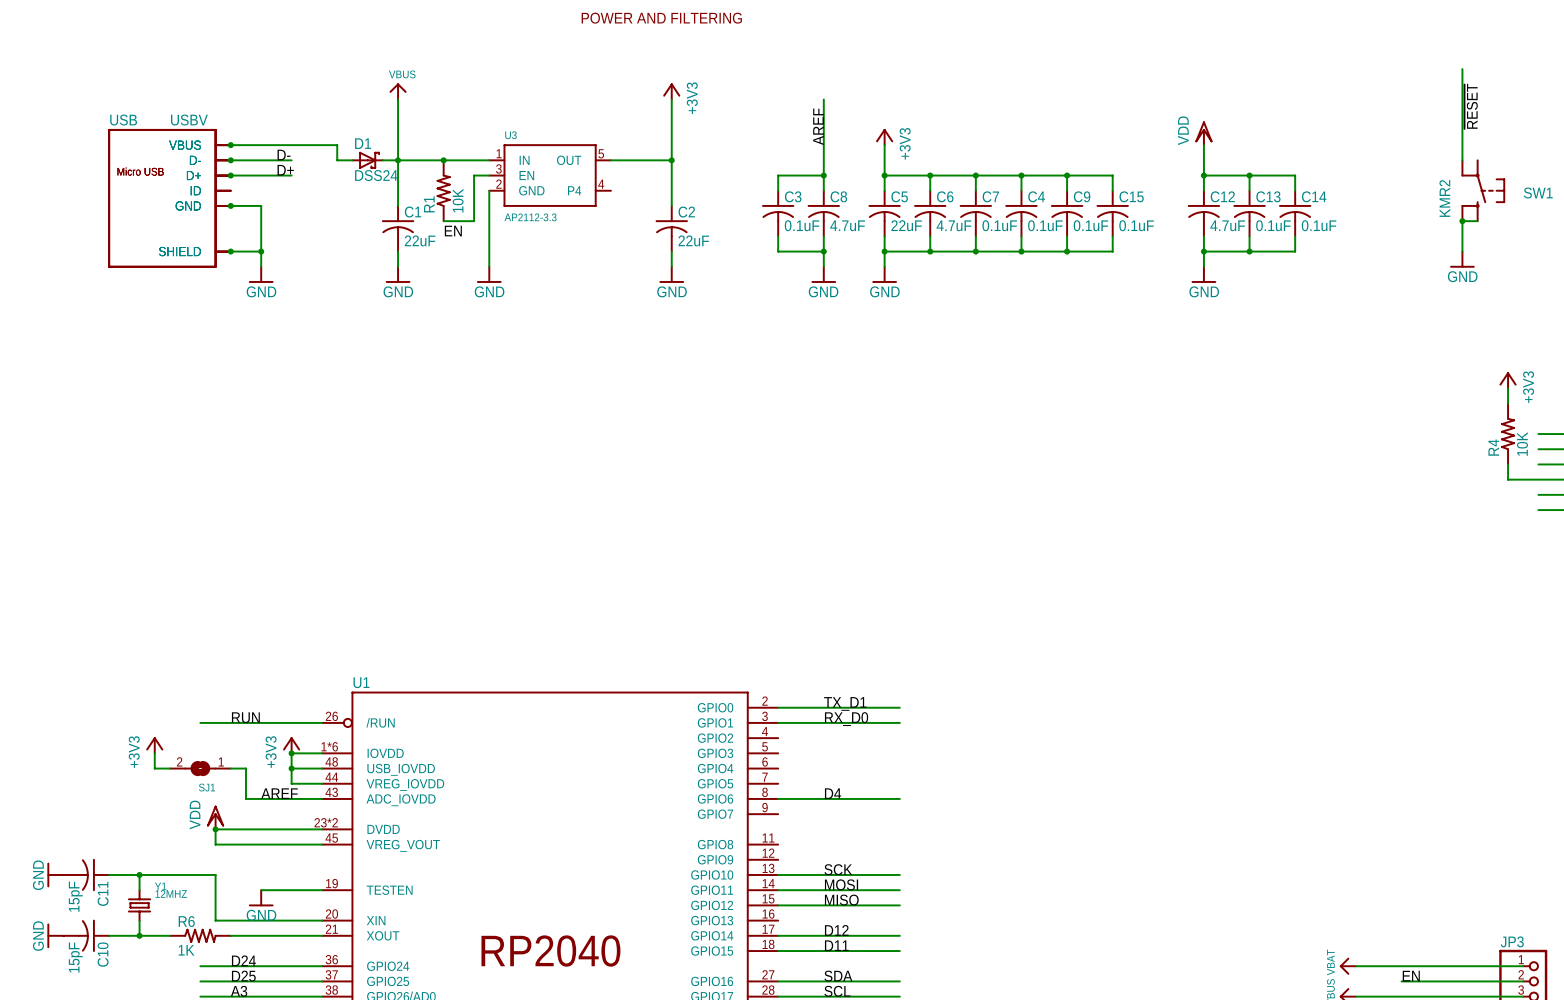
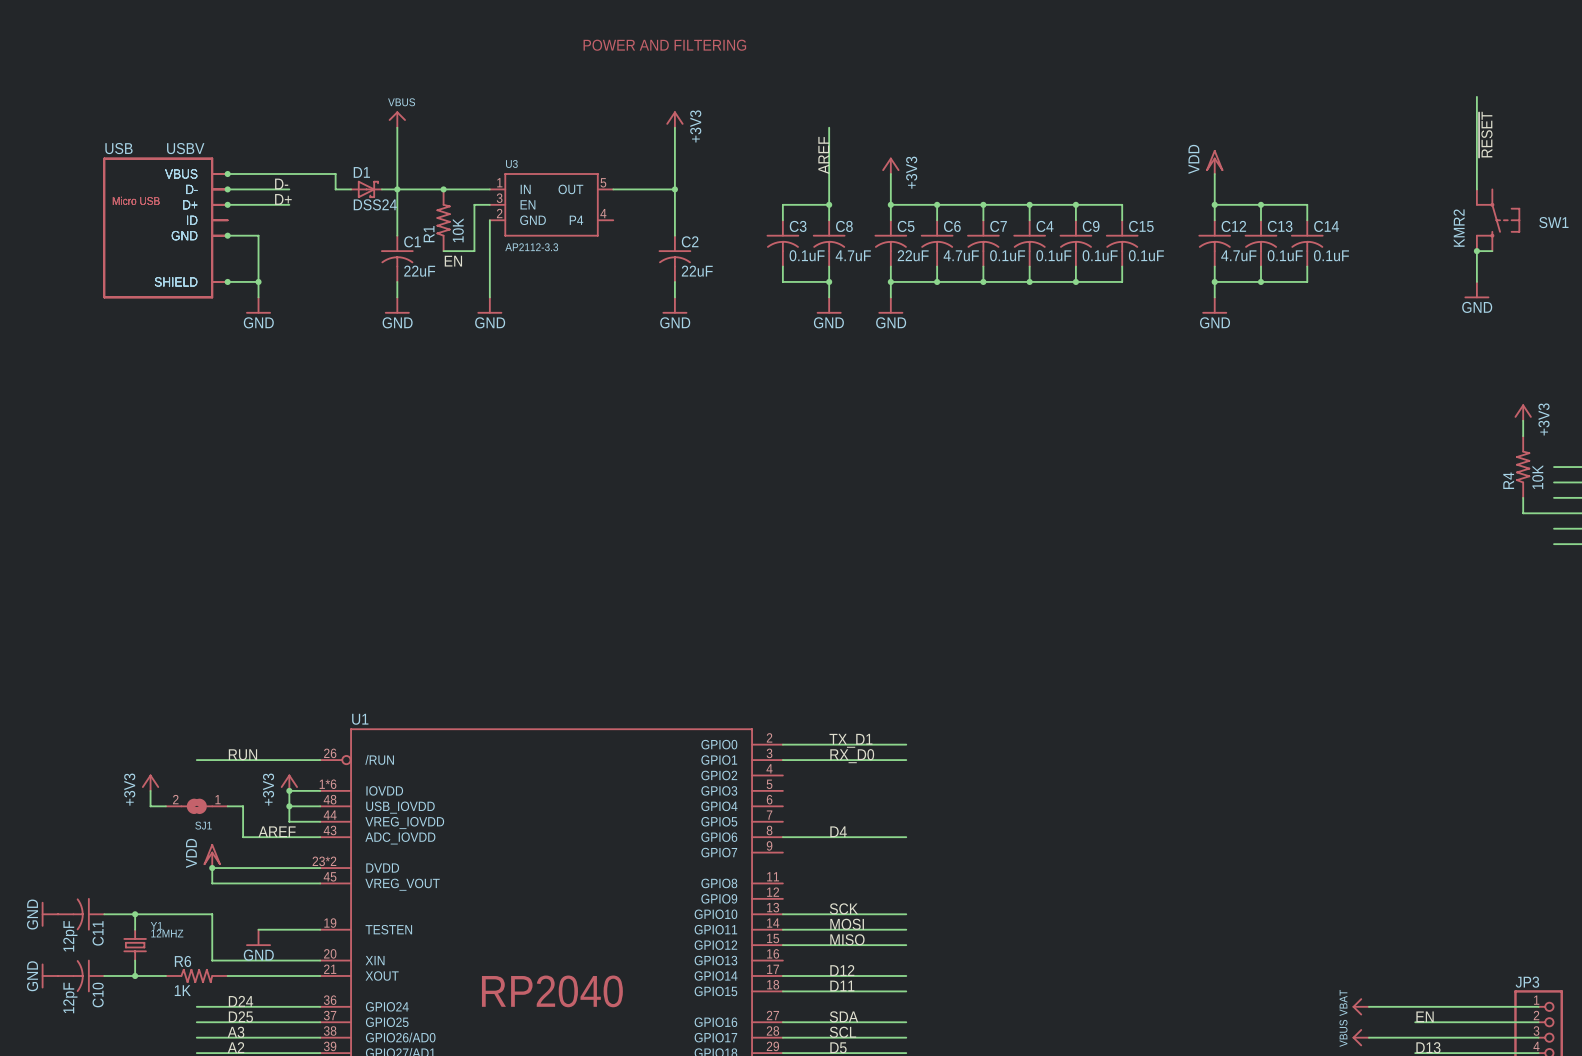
C11 value: 15pF (75, 896) -> 12pF (70, 936)
C10 value: 15pF (75, 957) -> 12pF (70, 997)

